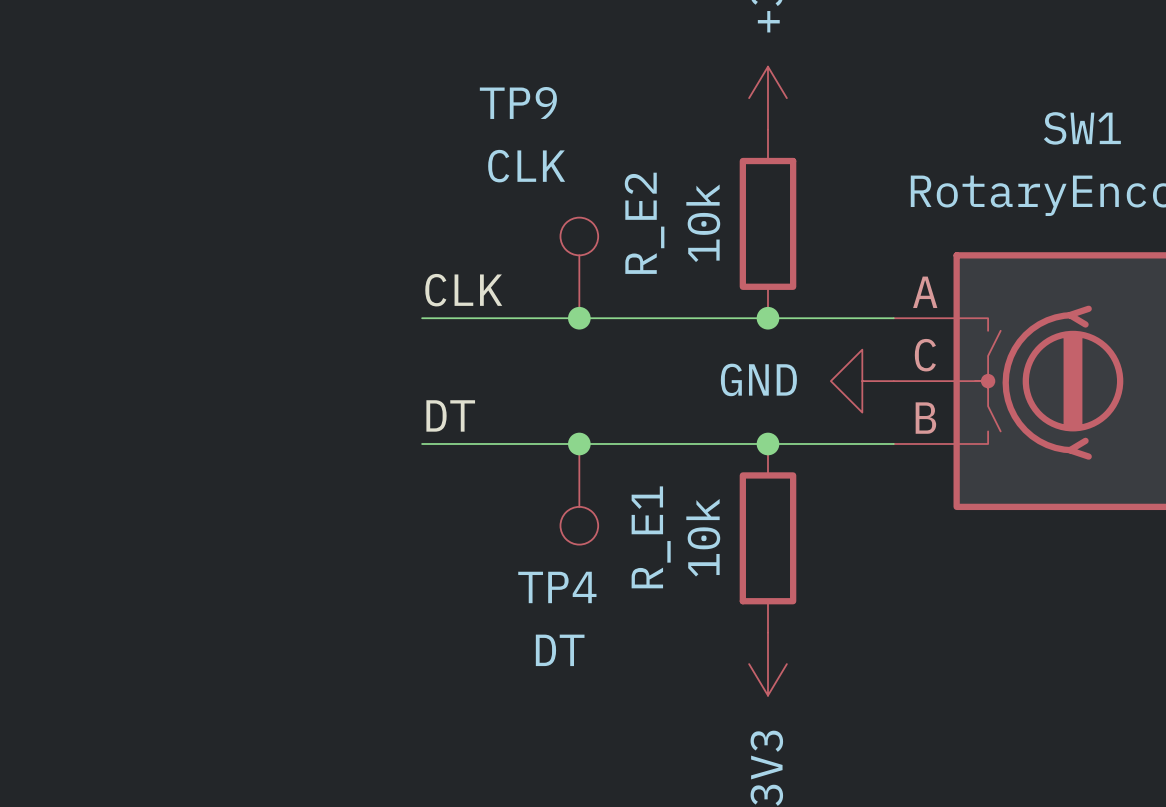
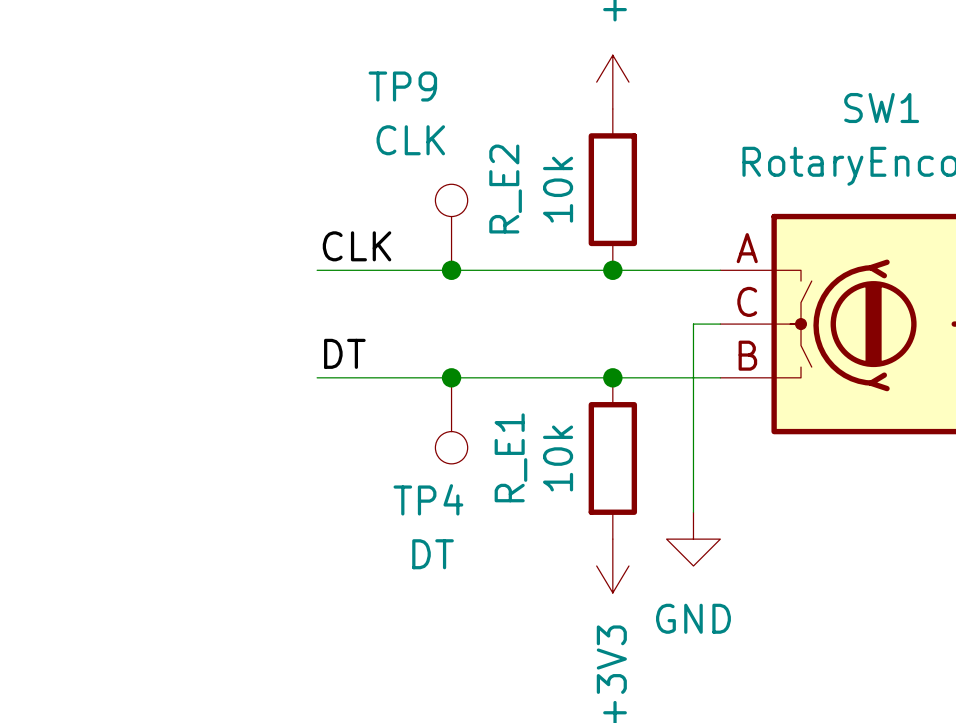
power symbol rotation: 0° (862, 381) -> 90° counterclockwise (693, 539)
power symbol position: GND (862, 381) -> GND (693, 539)
wire: none -> (720, 324) (693, 324) (693, 512)

